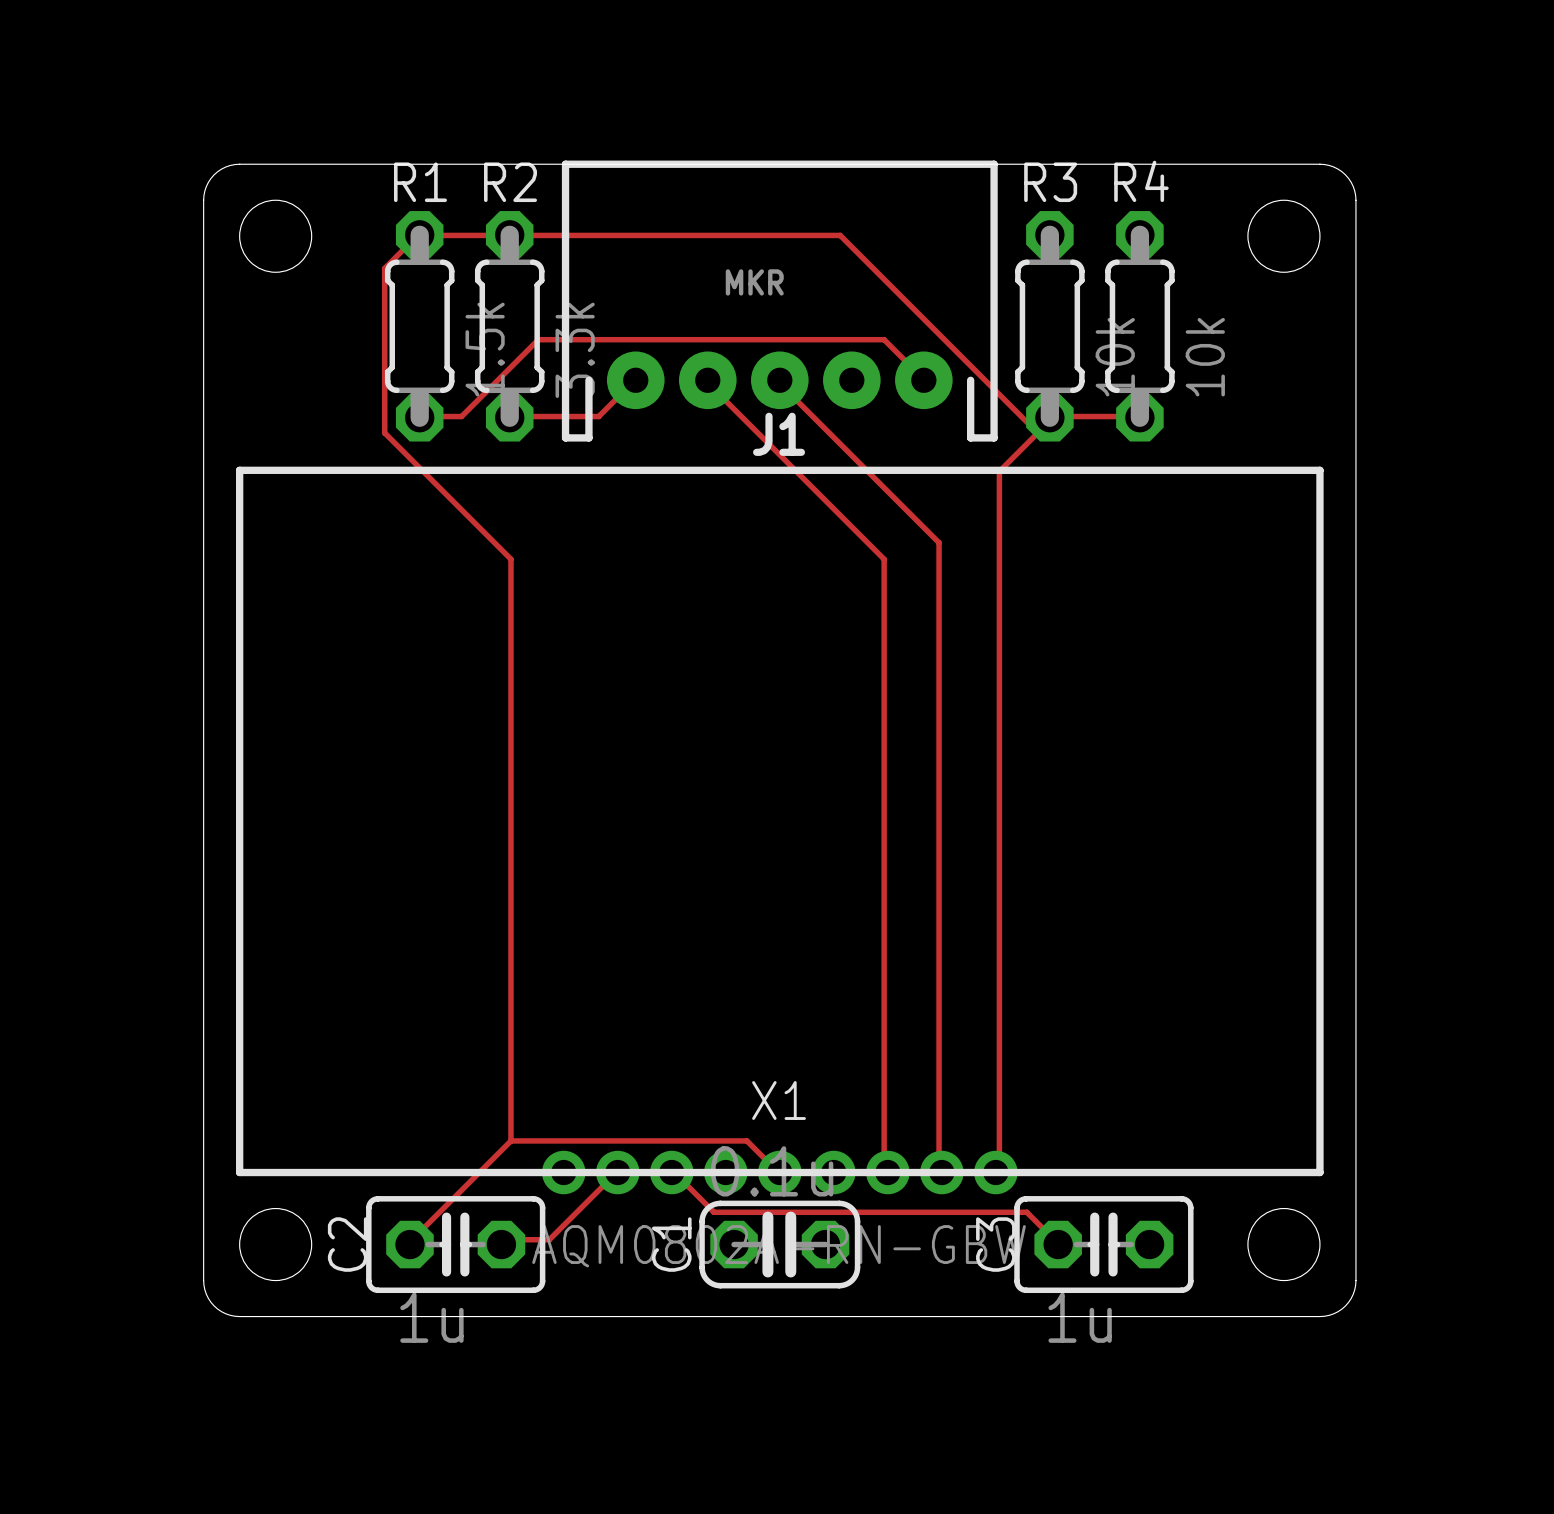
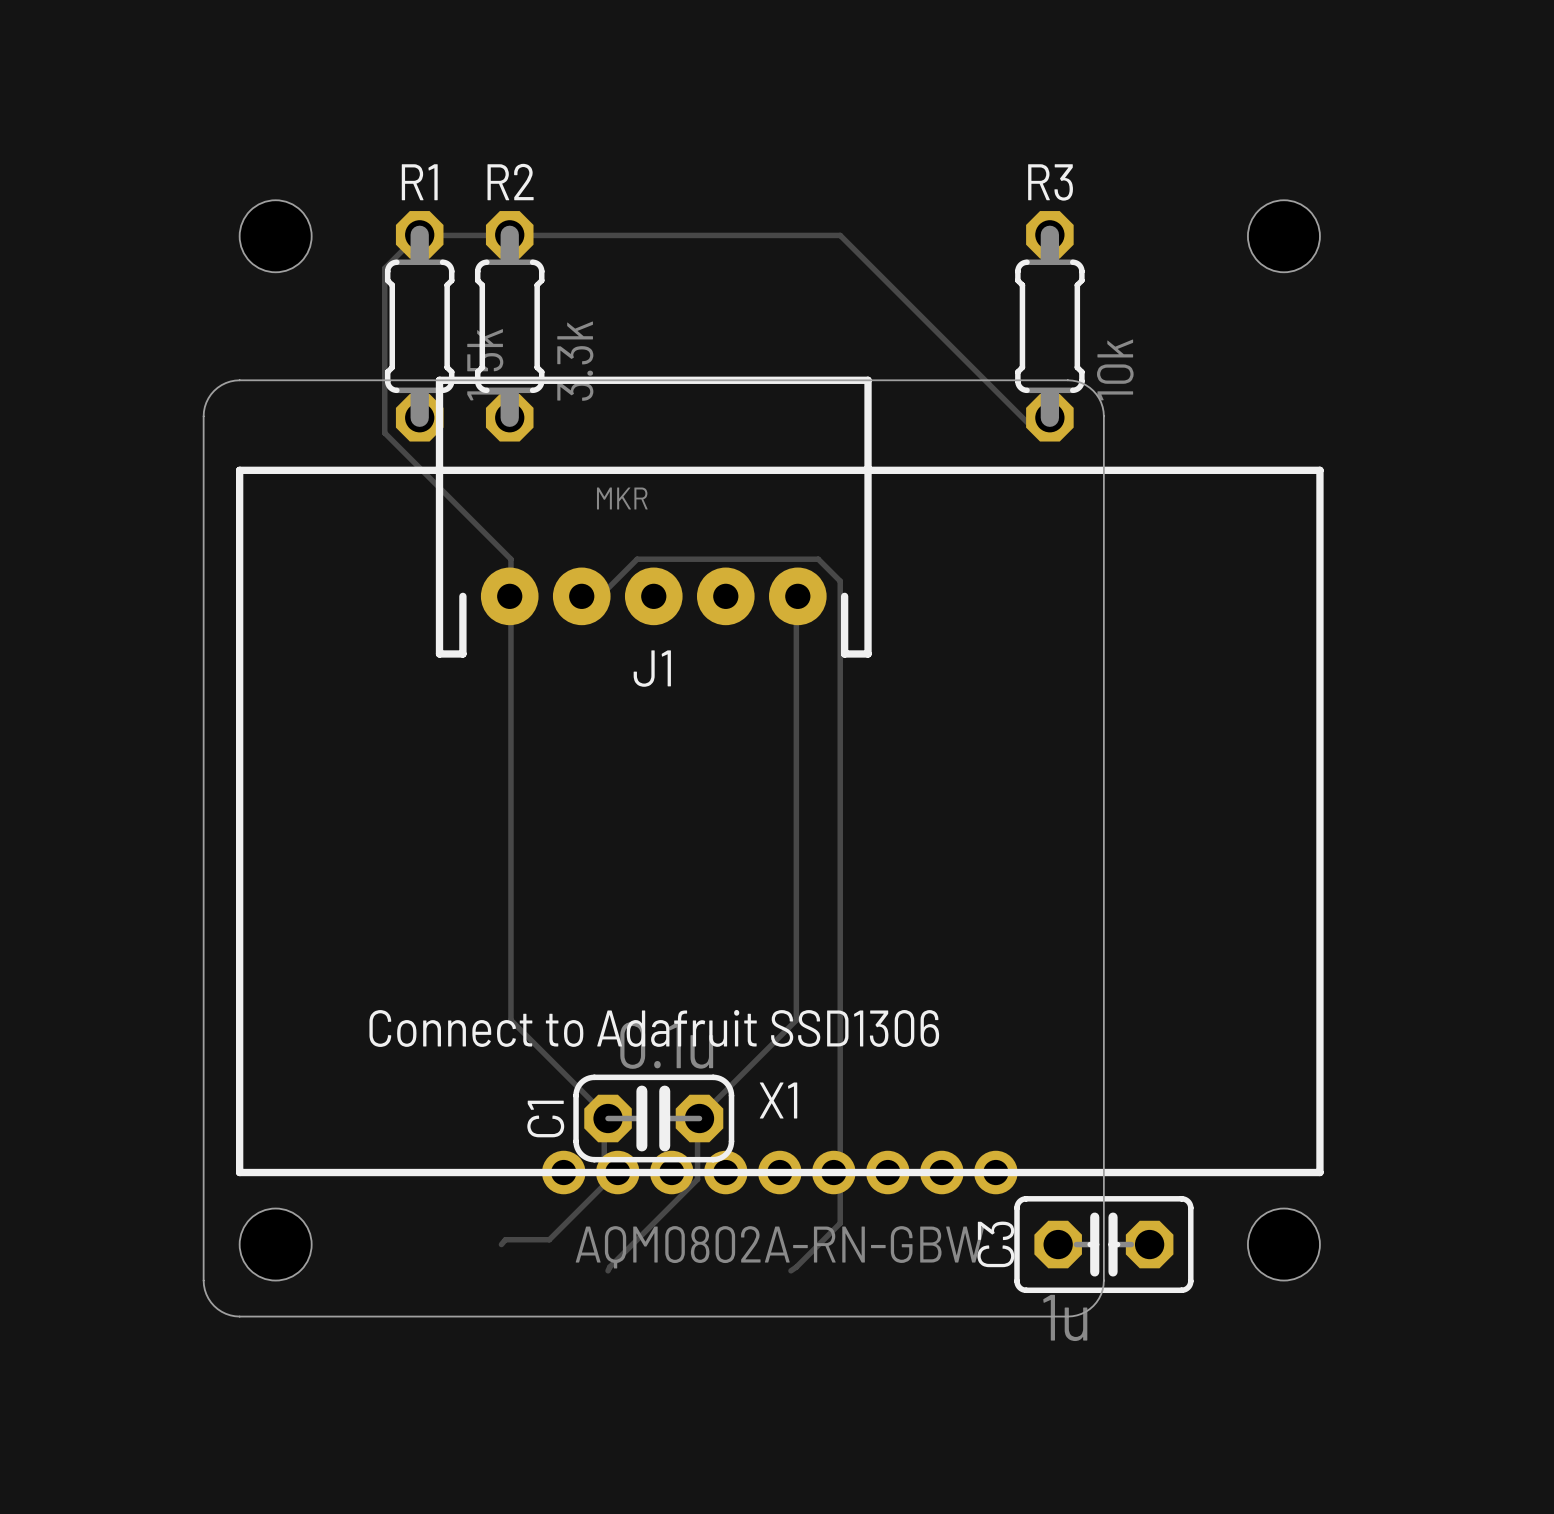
J1 position: (779, 301) -> (653, 517)
R4: 10k (1139, 326) -> none
track: (635, 380) (598, 416) (509, 417) -> none
track: (707, 380) (708, 383) (884, 559) (884, 1168) (887, 1172) -> none
track: (779, 380) (779, 383) (939, 542) (939, 1168) (941, 1172) -> none
track: (923, 380) (884, 339) (538, 339) (461, 416) (419, 417) -> none
board edge: (203, 416) (203, 195) (211, 178) (217, 171) (230, 165) (1319, 164) (1333, 166) (1345, 174) (1353, 186) (1355, 200) (1354, 1289) (1348, 1302) (1341, 1309) (1324, 1316) (1067, 1316) -> (203, 416) (206, 402) (214, 390) (225, 383) (239, 380) (1067, 380) (1081, 383) (1093, 390) (1101, 402) (1103, 416) (1103, 1280) (1101, 1294) (1093, 1306) (1081, 1313) (1067, 1316)
track: (1139, 417) (1049, 417) (1048, 422) (999, 471) (999, 1168) (995, 1172) -> none
J1 name position: J1 (779, 434) -> J1 (652, 668)
track: none -> (581, 596) (582, 592) (604, 592) (637, 559) (818, 559) (840, 581) (840, 1223) (790, 1270)
track: none -> (797, 596) (796, 1020) (697, 1118) (697, 1179) (608, 1270)
track: (510, 1020) (510, 1140) -> (510, 1020) (608, 1118) (604, 1118) (604, 1184)
text: none -> Connect to Adafruit SSD1306 (654, 1028)
track: (510, 1140) (746, 1140) (779, 1172) -> none
track: (510, 1140) (412, 1239) (409, 1244) -> none
track: (671, 1172) (675, 1173) (714, 1212) (1026, 1212) (1058, 1244) -> none
C2: 1u (455, 1244) -> none
C1 position: (779, 1244) -> (653, 1118)

